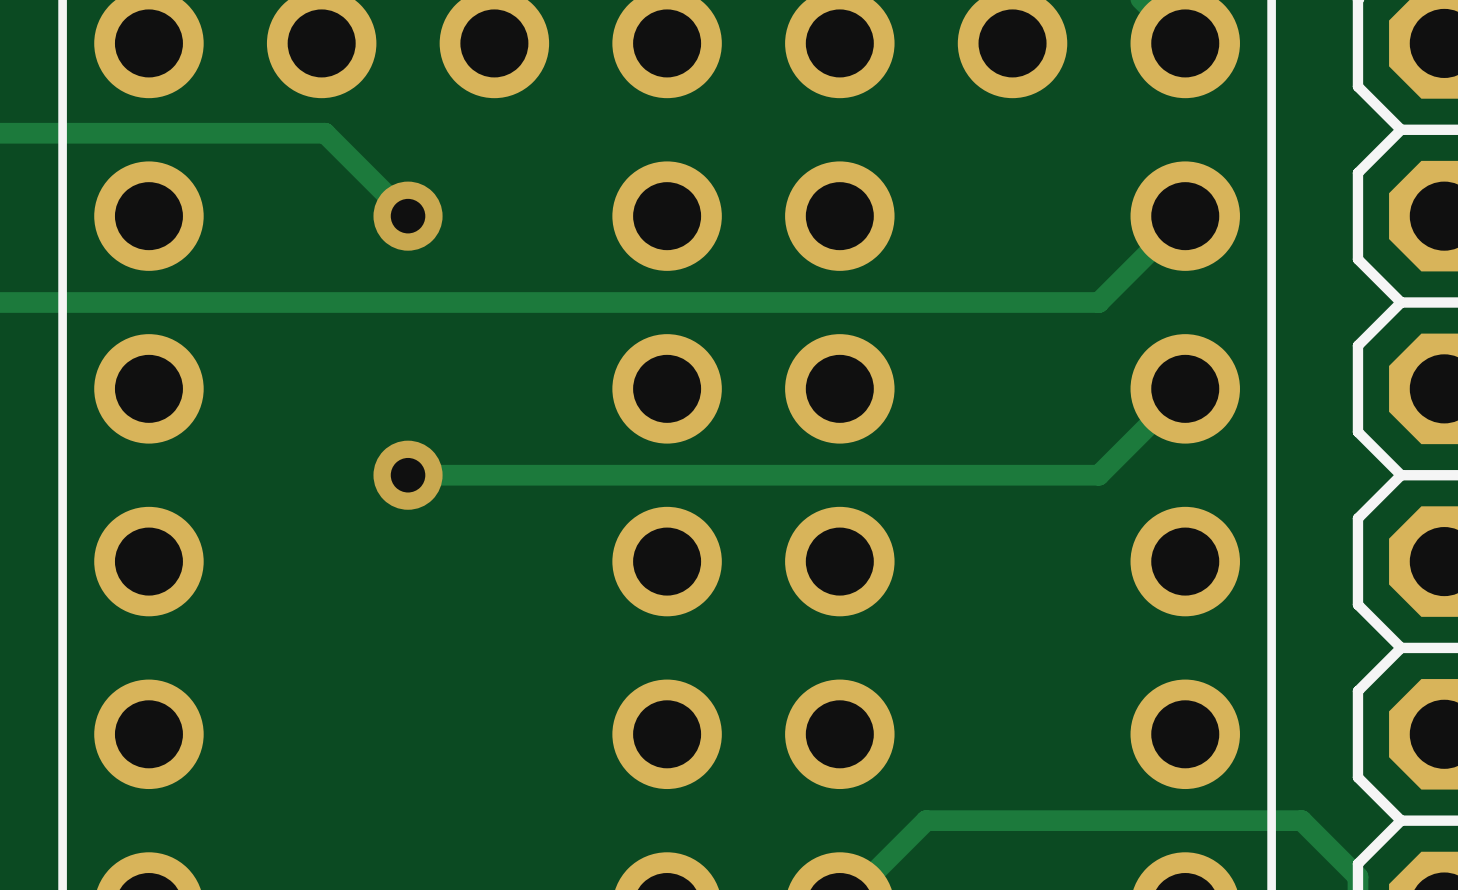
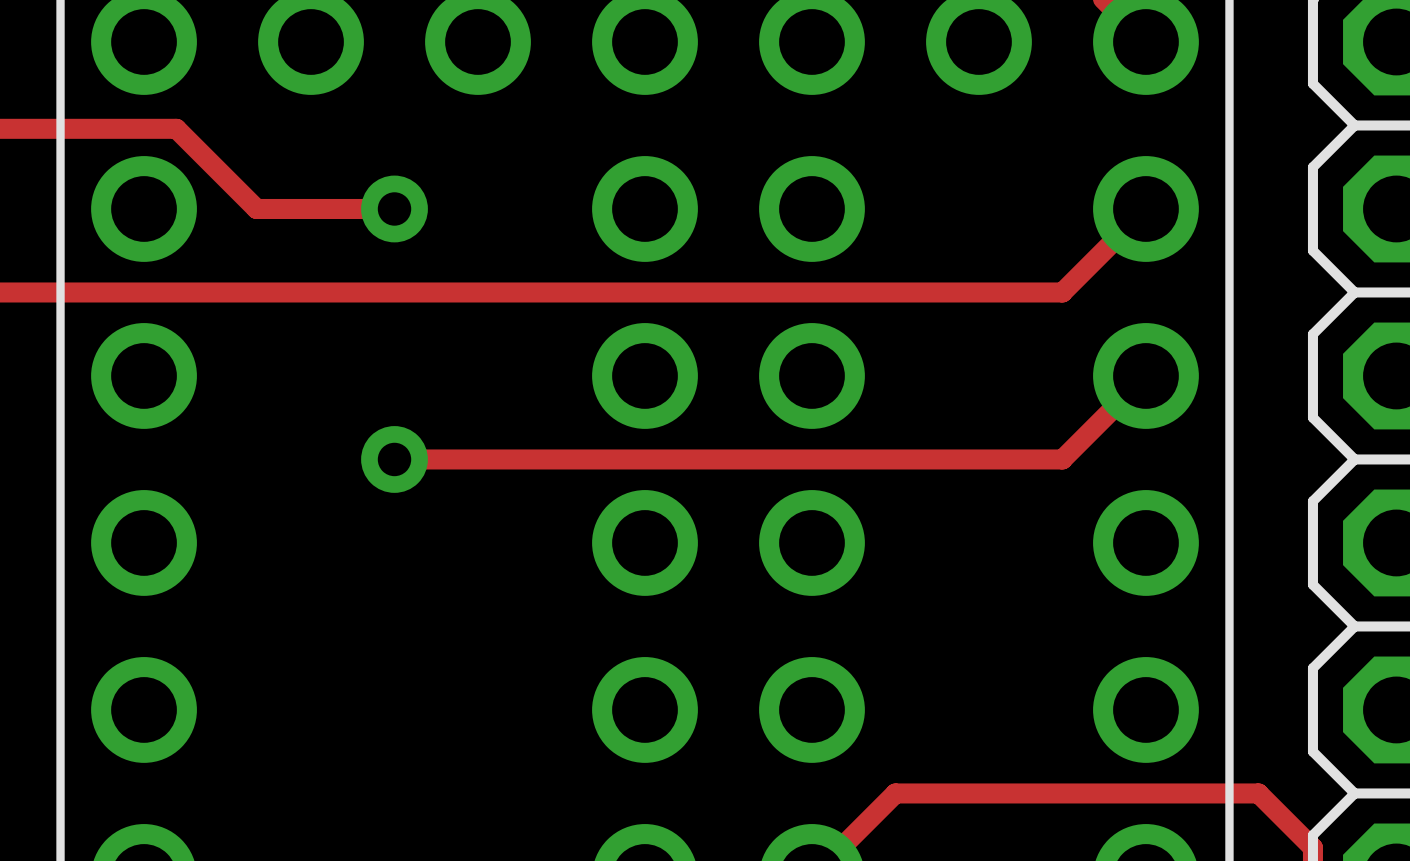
track: (182, 133) (325, 133) (408, 216) -> (176, 128) (256, 208) (394, 208)

